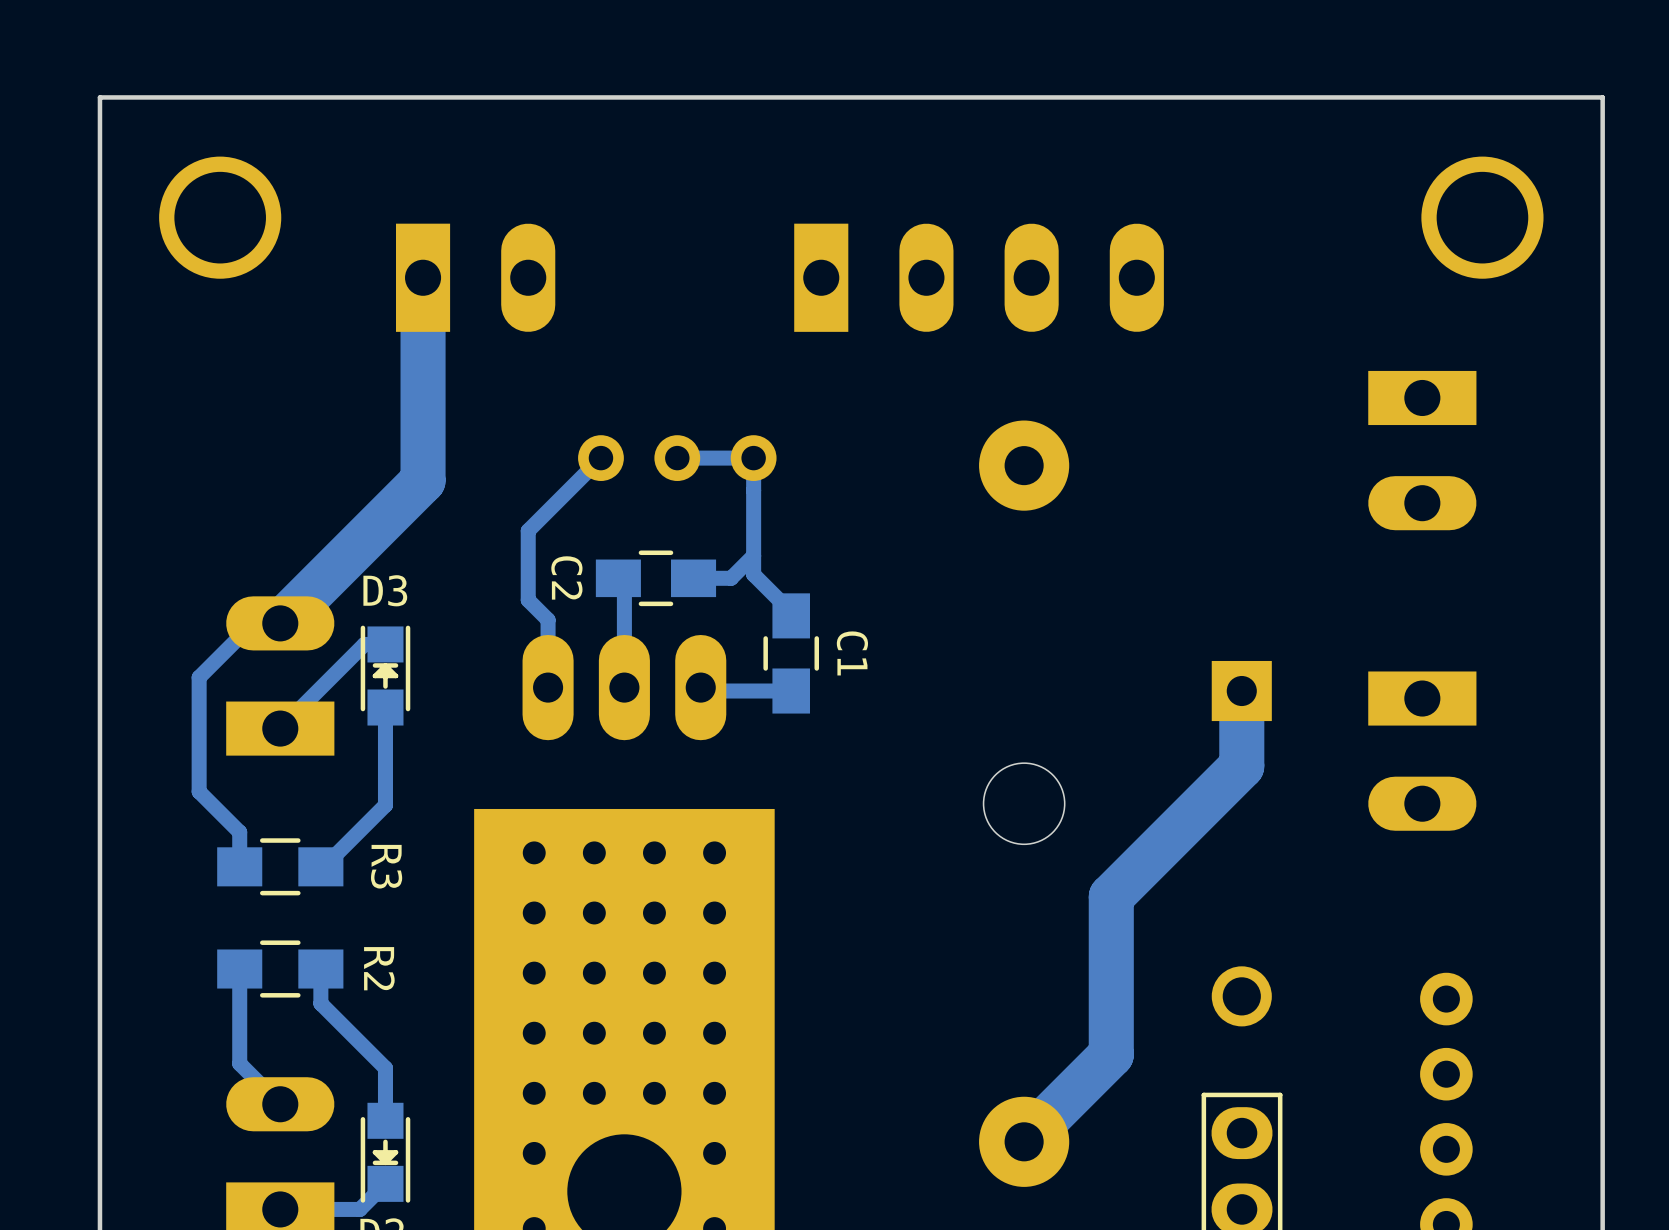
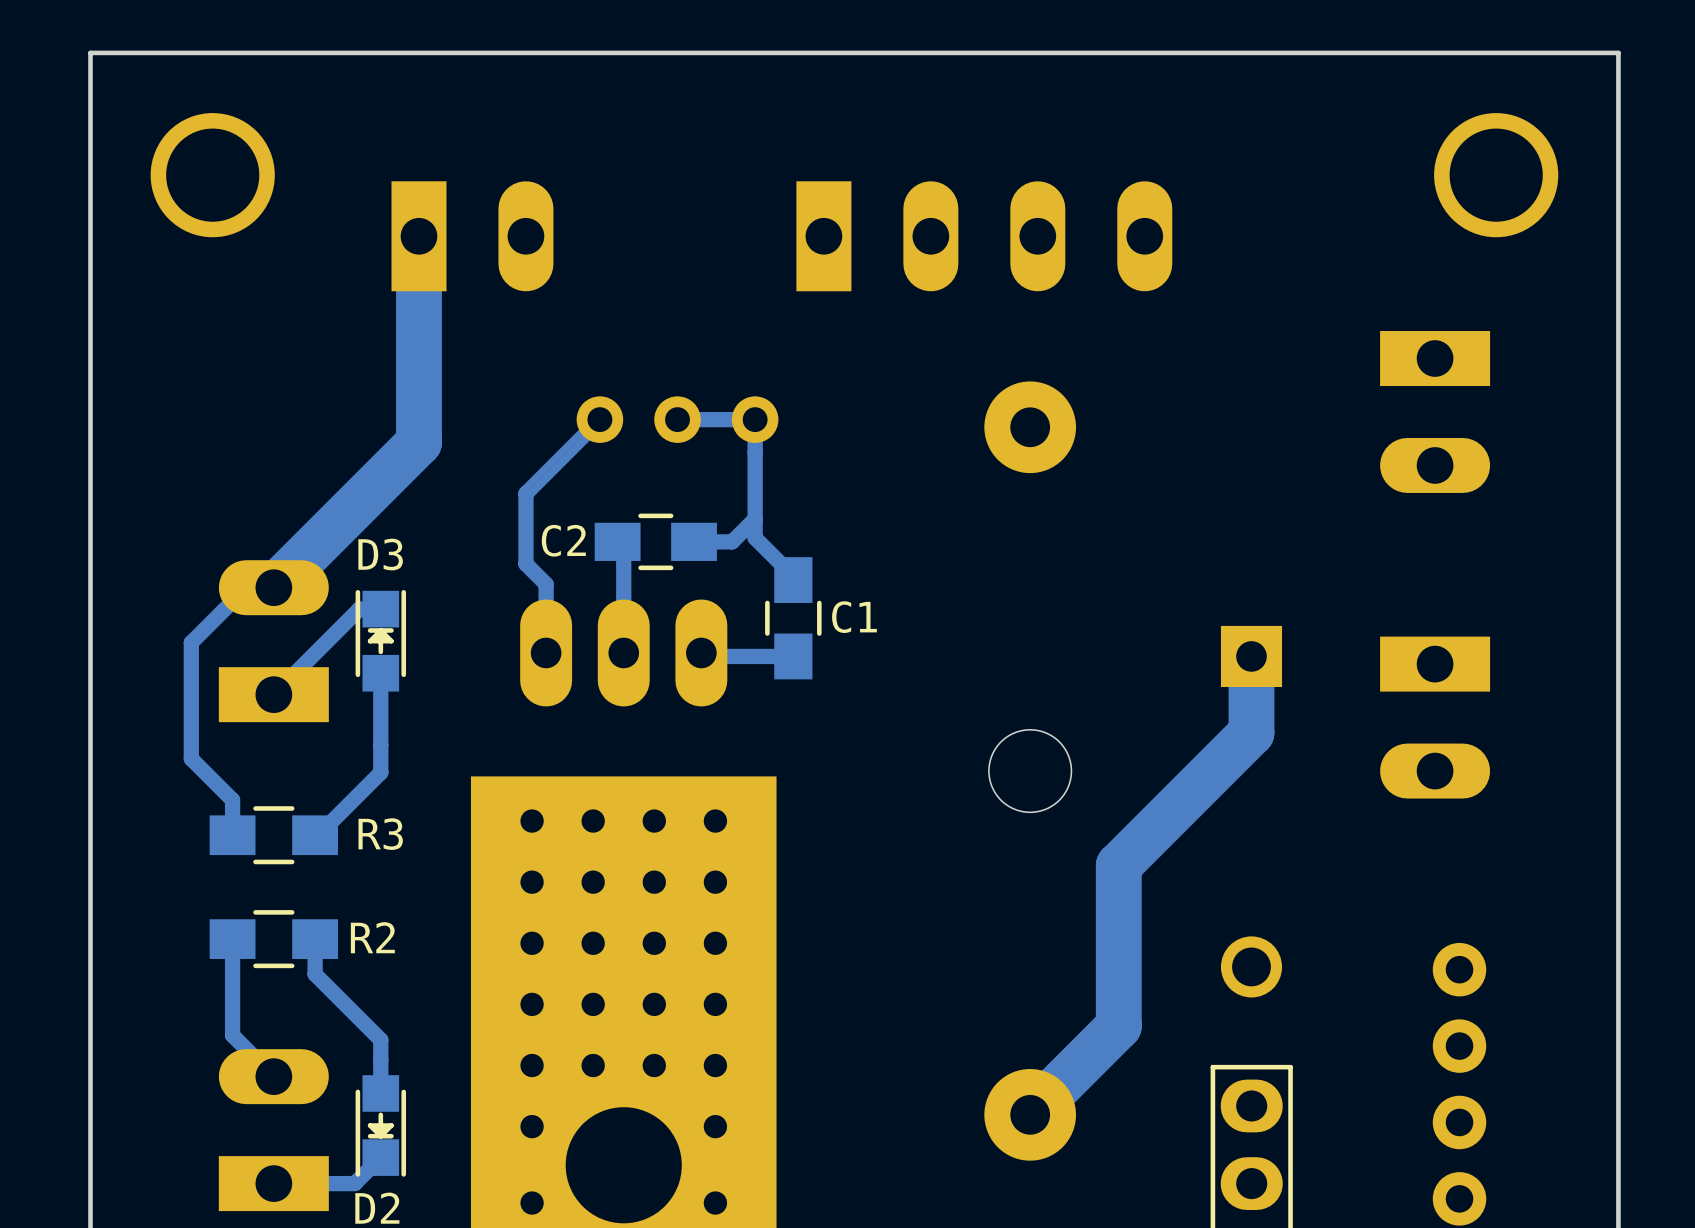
C2 name rotation: 0° (566, 577) -> 90° counterclockwise (563, 540)
C1 name rotation: 0° (852, 653) -> 90° counterclockwise (854, 617)
R3 name rotation: 0° (386, 866) -> 90° counterclockwise (380, 834)
R2 name rotation: 0° (379, 968) -> 90° counterclockwise (372, 937)

